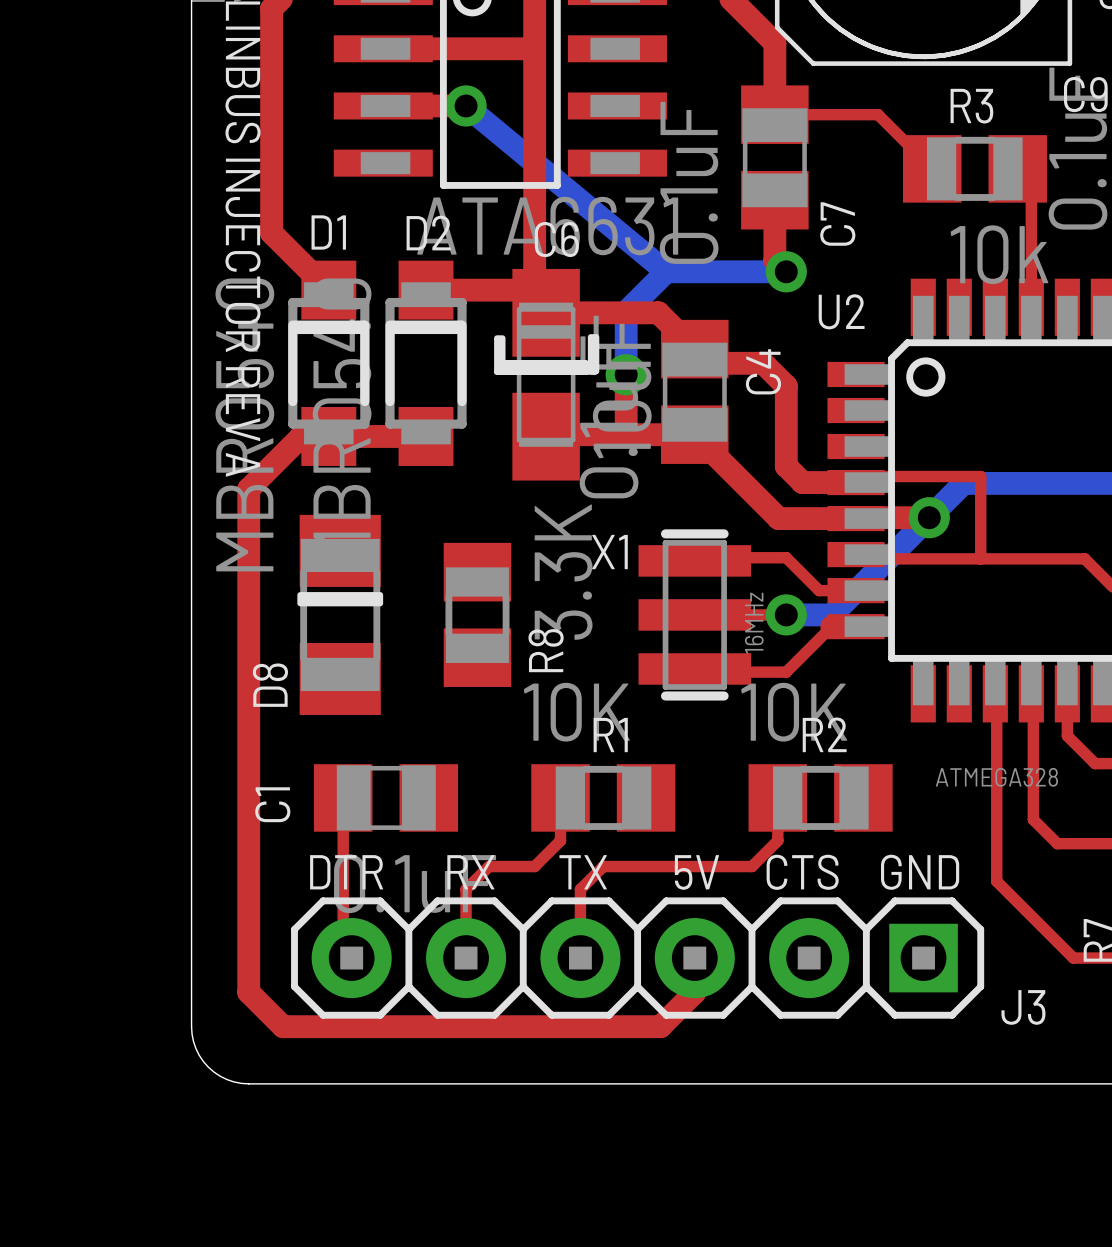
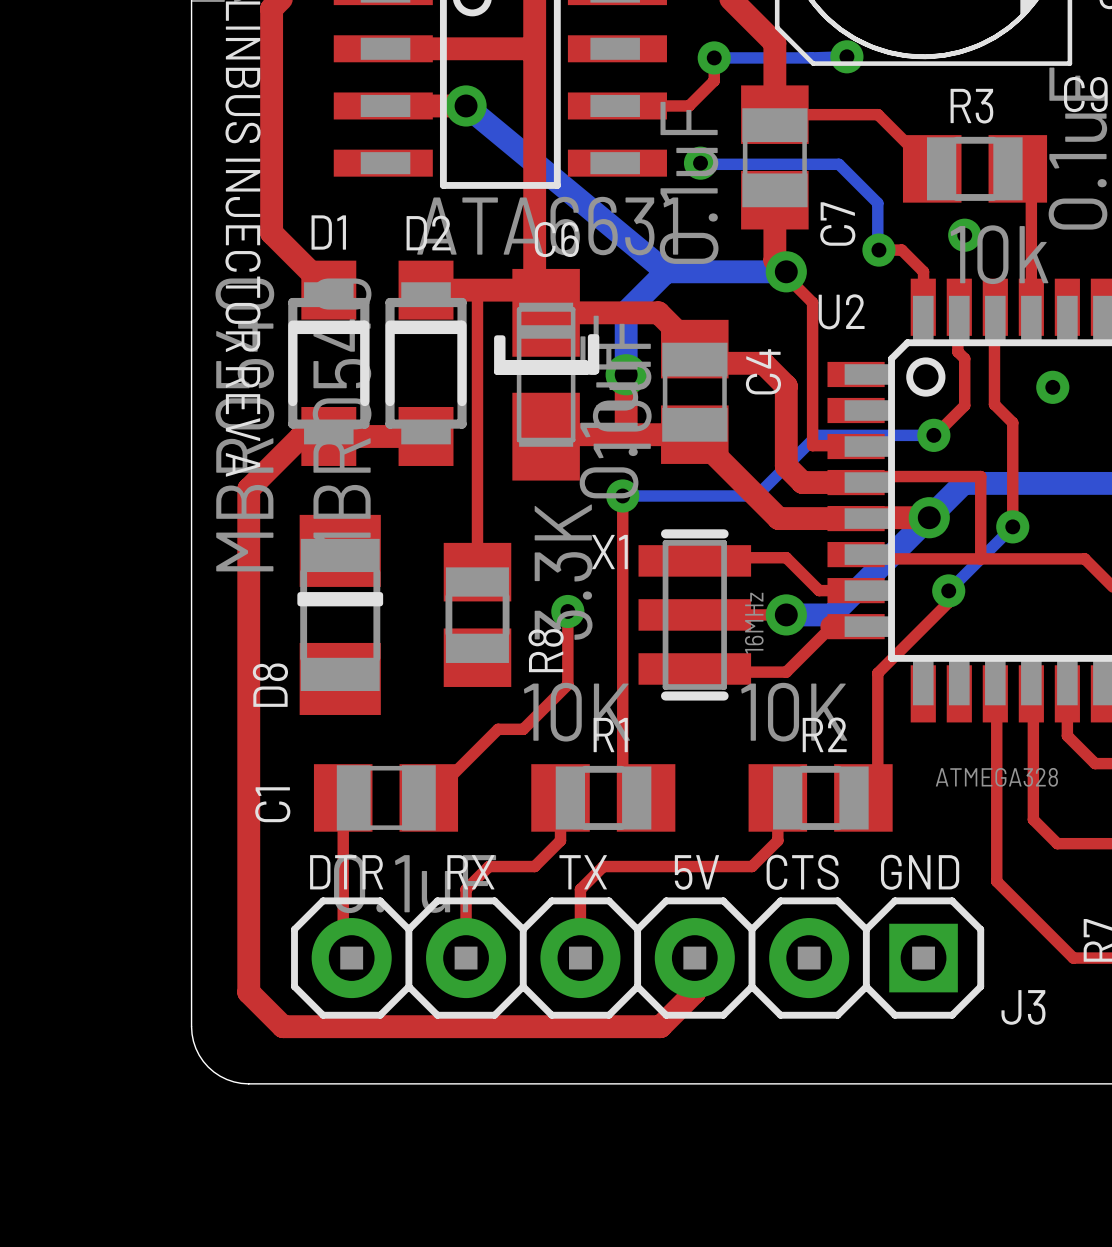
bottom track: none -> (846, 56) (714, 57)
via: none -> (846, 56)
top track: none -> (714, 57) (714, 80) (689, 105) (617, 105)
via: none -> (714, 57)
bottom track: none -> (700, 163) (838, 164) (877, 203) (878, 250)
via: none -> (700, 163)
via: none -> (964, 235)
top track: none -> (878, 250) (901, 250) (923, 271) (923, 307)
via: none -> (878, 250)
top track: none -> (786, 271) (792, 282) (812, 302) (812, 445) (856, 445)
top track: none -> (477, 290) (477, 572)
top track: none -> (959, 307) (957, 351) (964, 358) (964, 405) (933, 435)
top track: none -> (995, 307) (994, 404) (1012, 422) (1012, 526)
via: none -> (1052, 387)
bottom track: none -> (933, 435) (817, 435) (756, 495) (622, 495)
via: none -> (933, 435)
top track: none -> (622, 495) (622, 775) (645, 797)
via: none -> (622, 495)
bottom track: none -> (1012, 526) (948, 590)
via: none -> (1012, 526)
top track: none -> (948, 590) (948, 602) (877, 673) (877, 784) (864, 797)
via: none -> (948, 590)
top track: none -> (567, 611) (567, 684) (523, 729) (498, 729) (429, 797)
via: none -> (567, 611)

